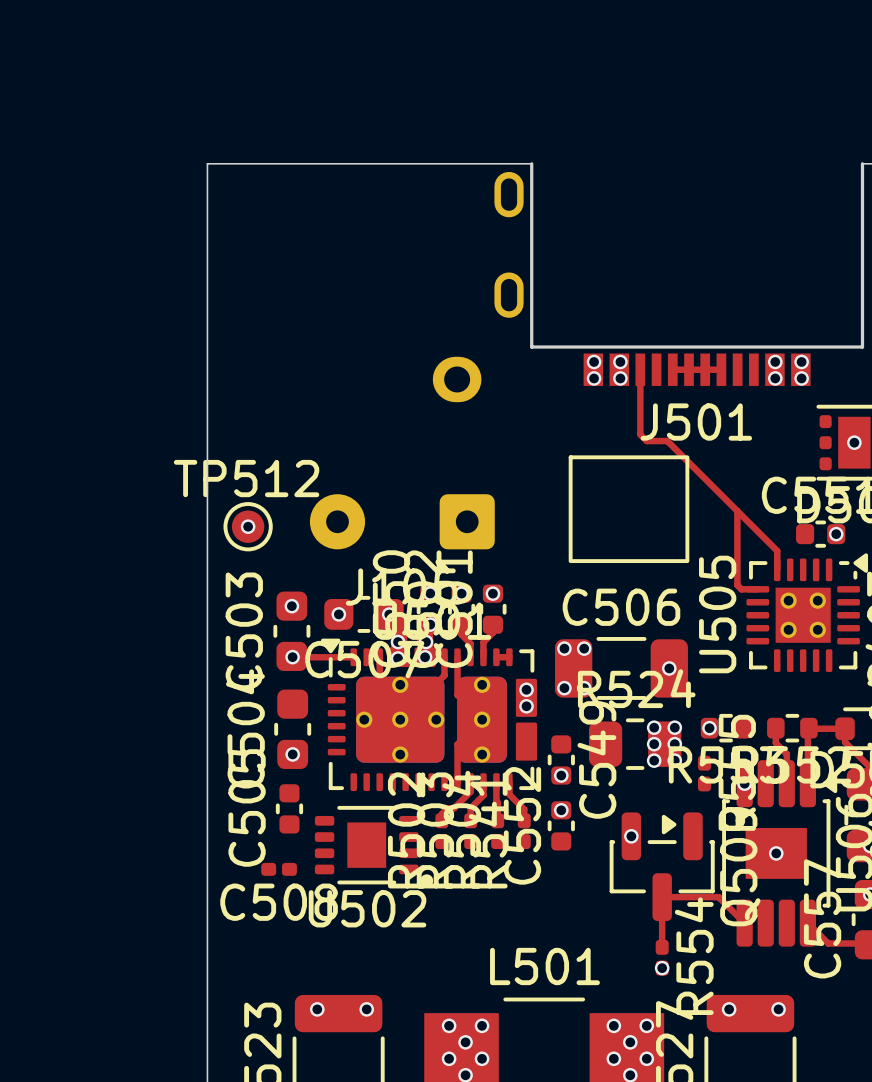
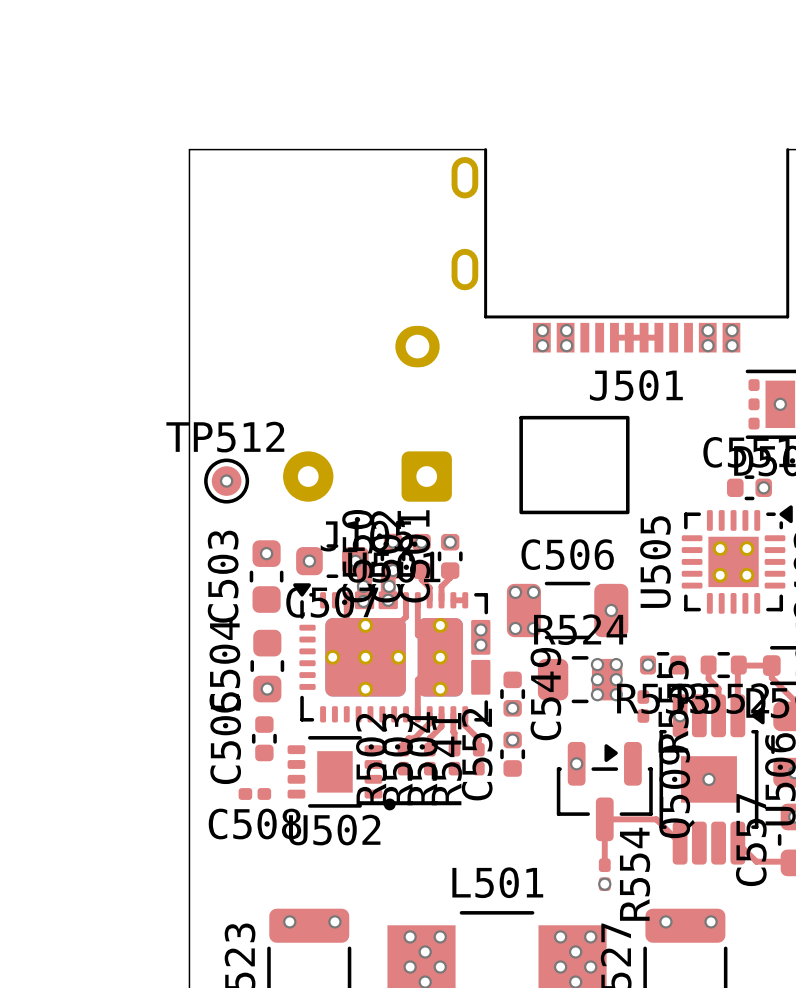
top track: (640, 369) (640, 434) (646, 441) (667, 441) (777, 550) (777, 569) -> none
top track: (737, 511) (737, 585) (741, 589) (757, 589) -> none
top track: (291, 656) (353, 657) -> none
via: (292, 657) -> none

